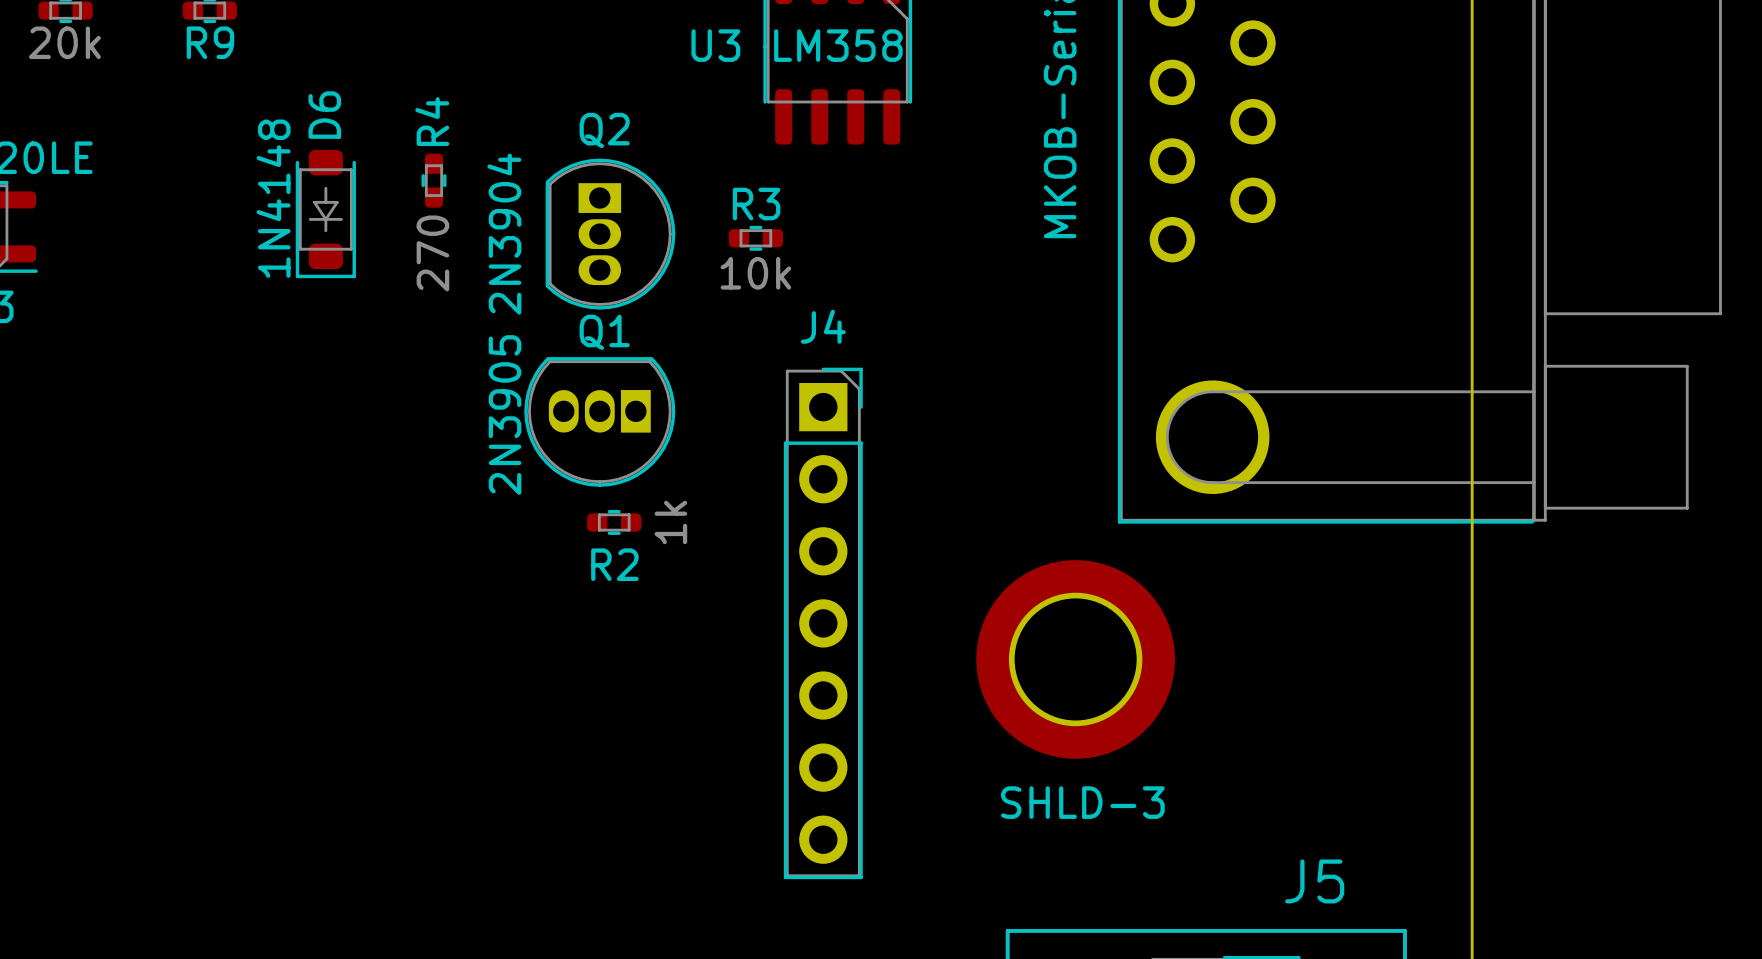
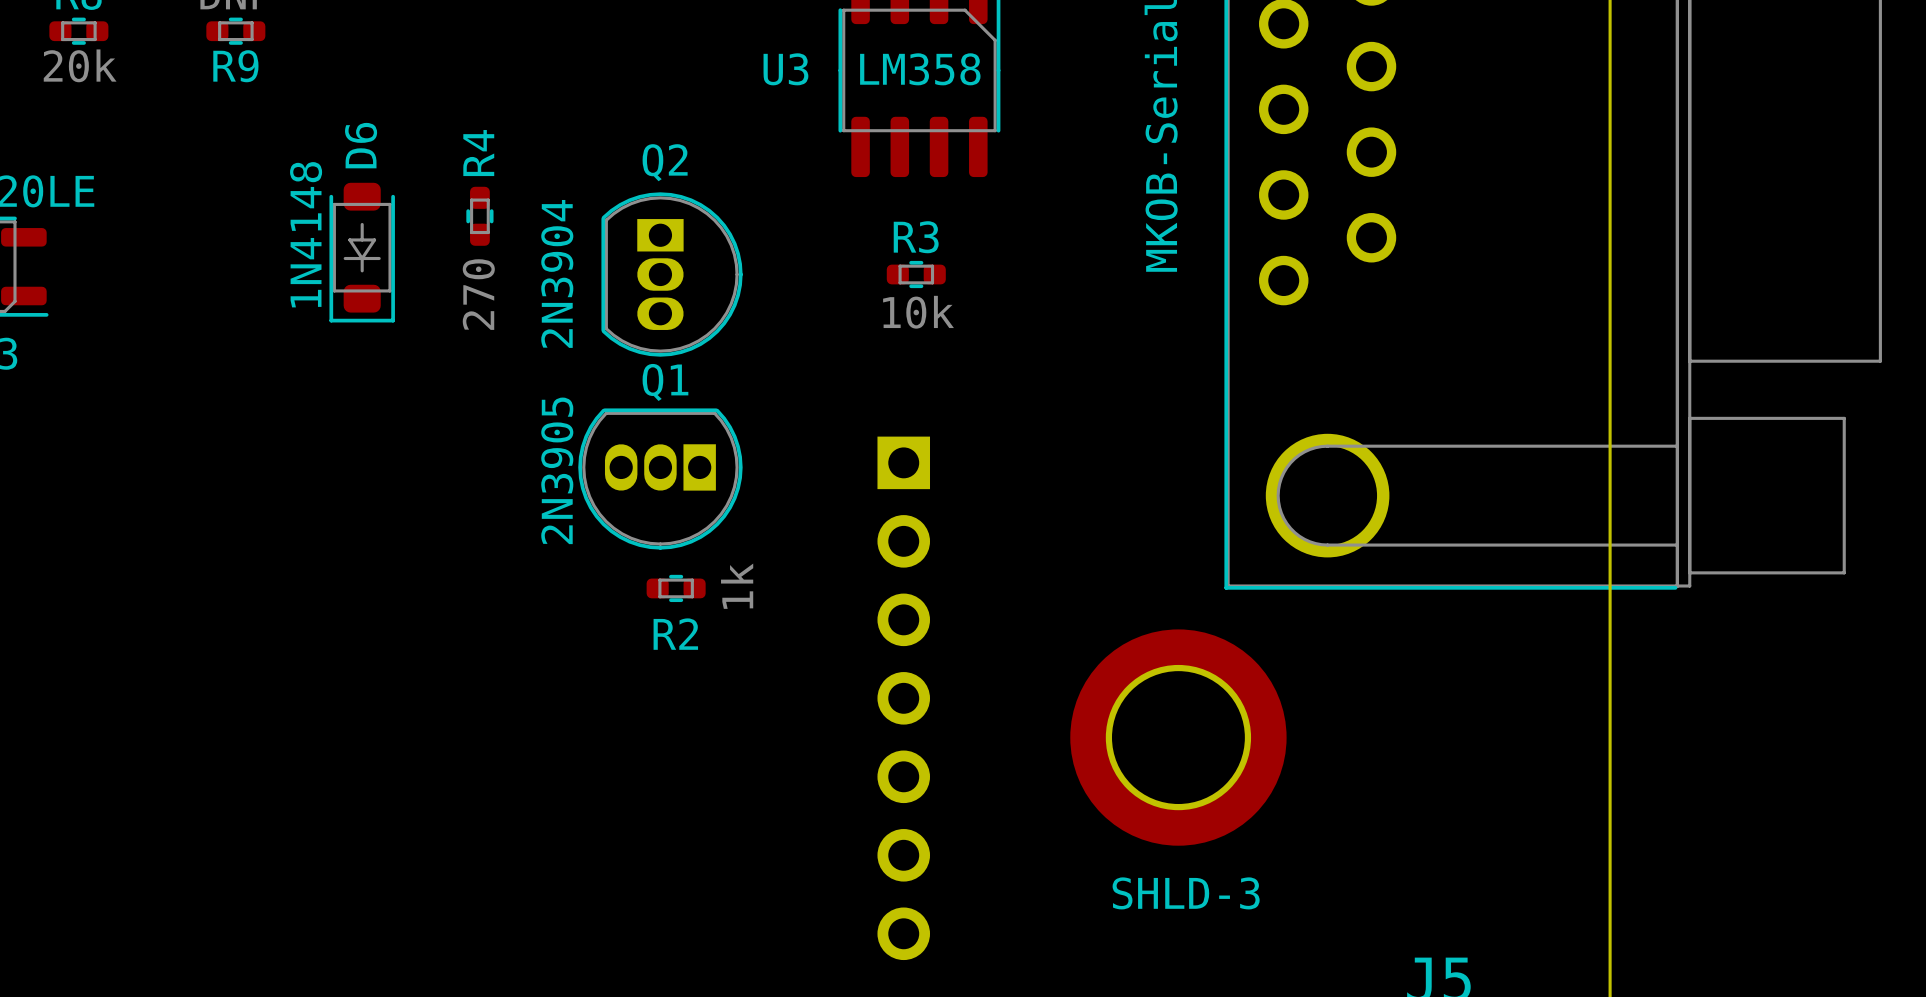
R3 position: (755, 238) -> (916, 274)
J4 side: top (823, 623) -> bottom (903, 698)

